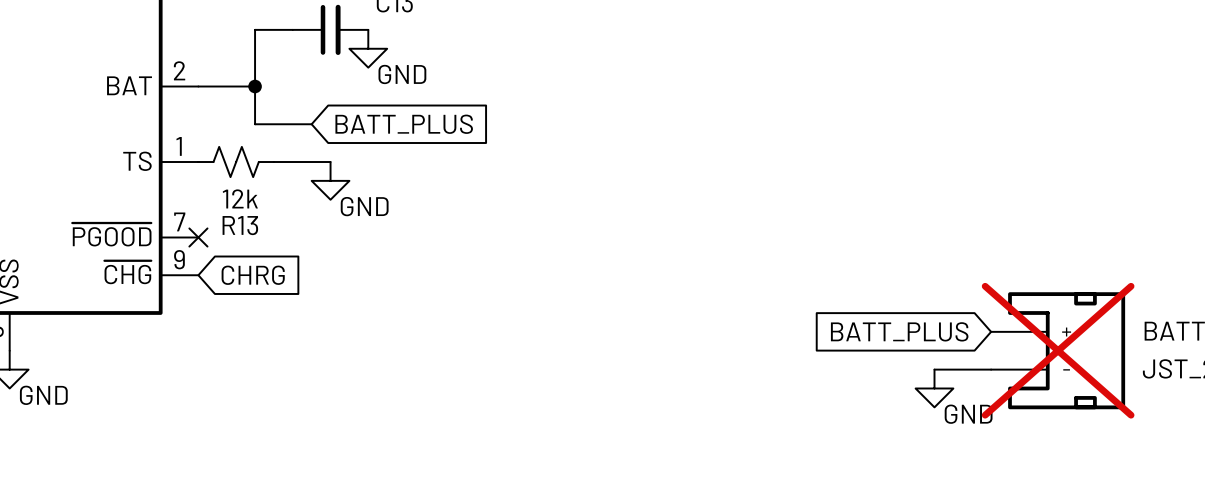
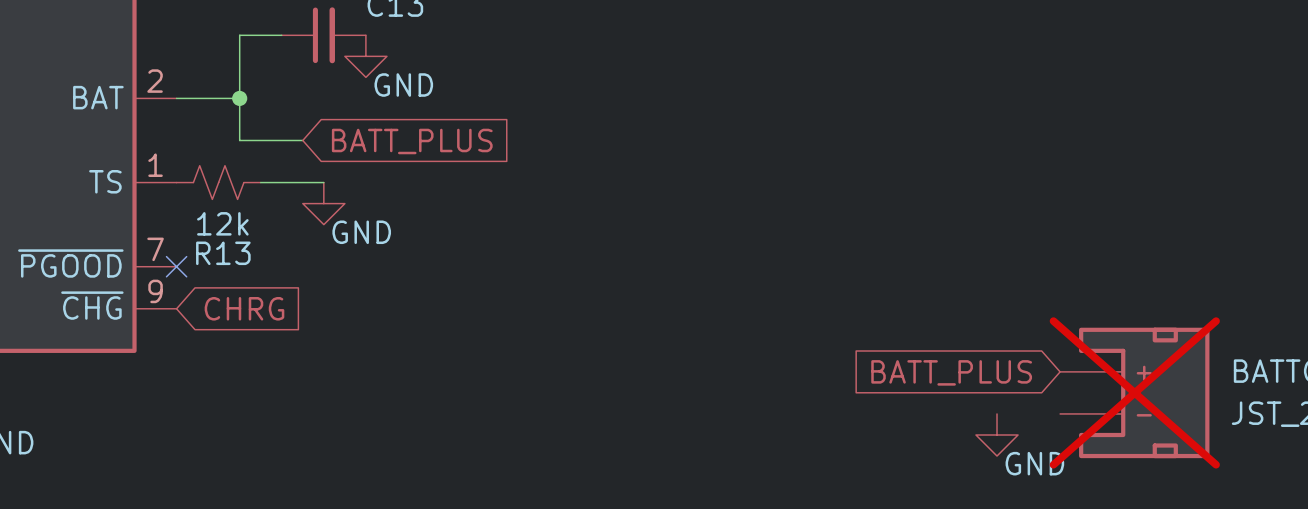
wire: (934, 369) (991, 369) -> none

